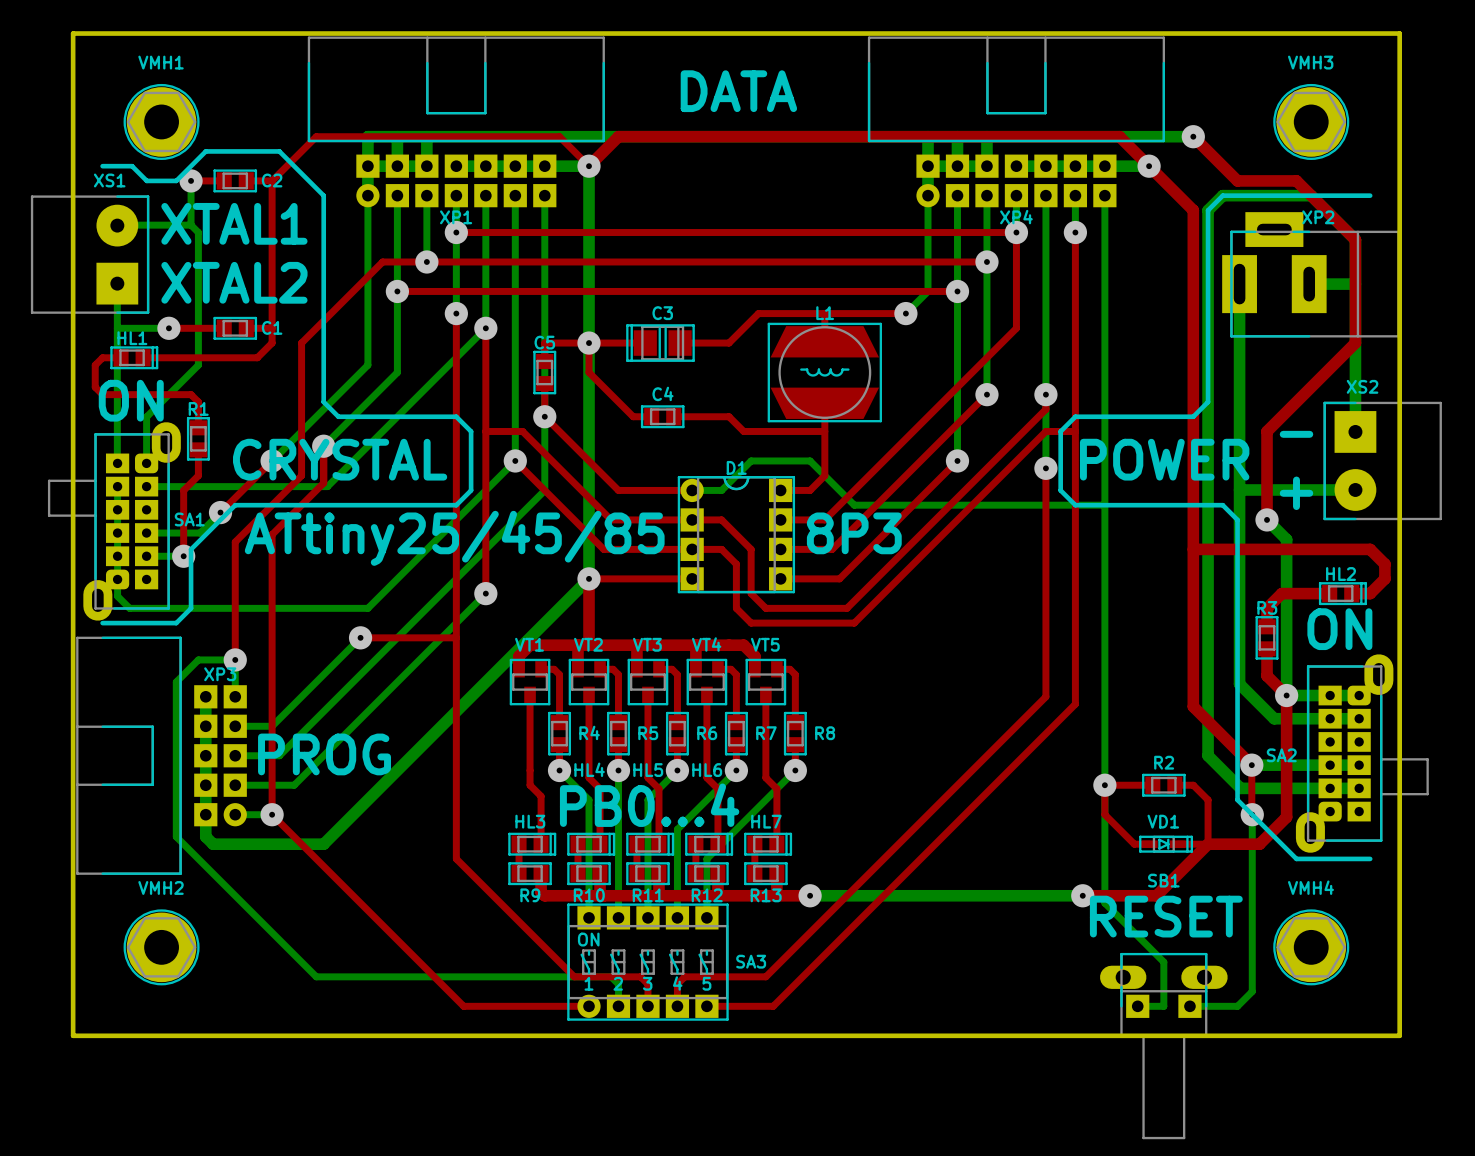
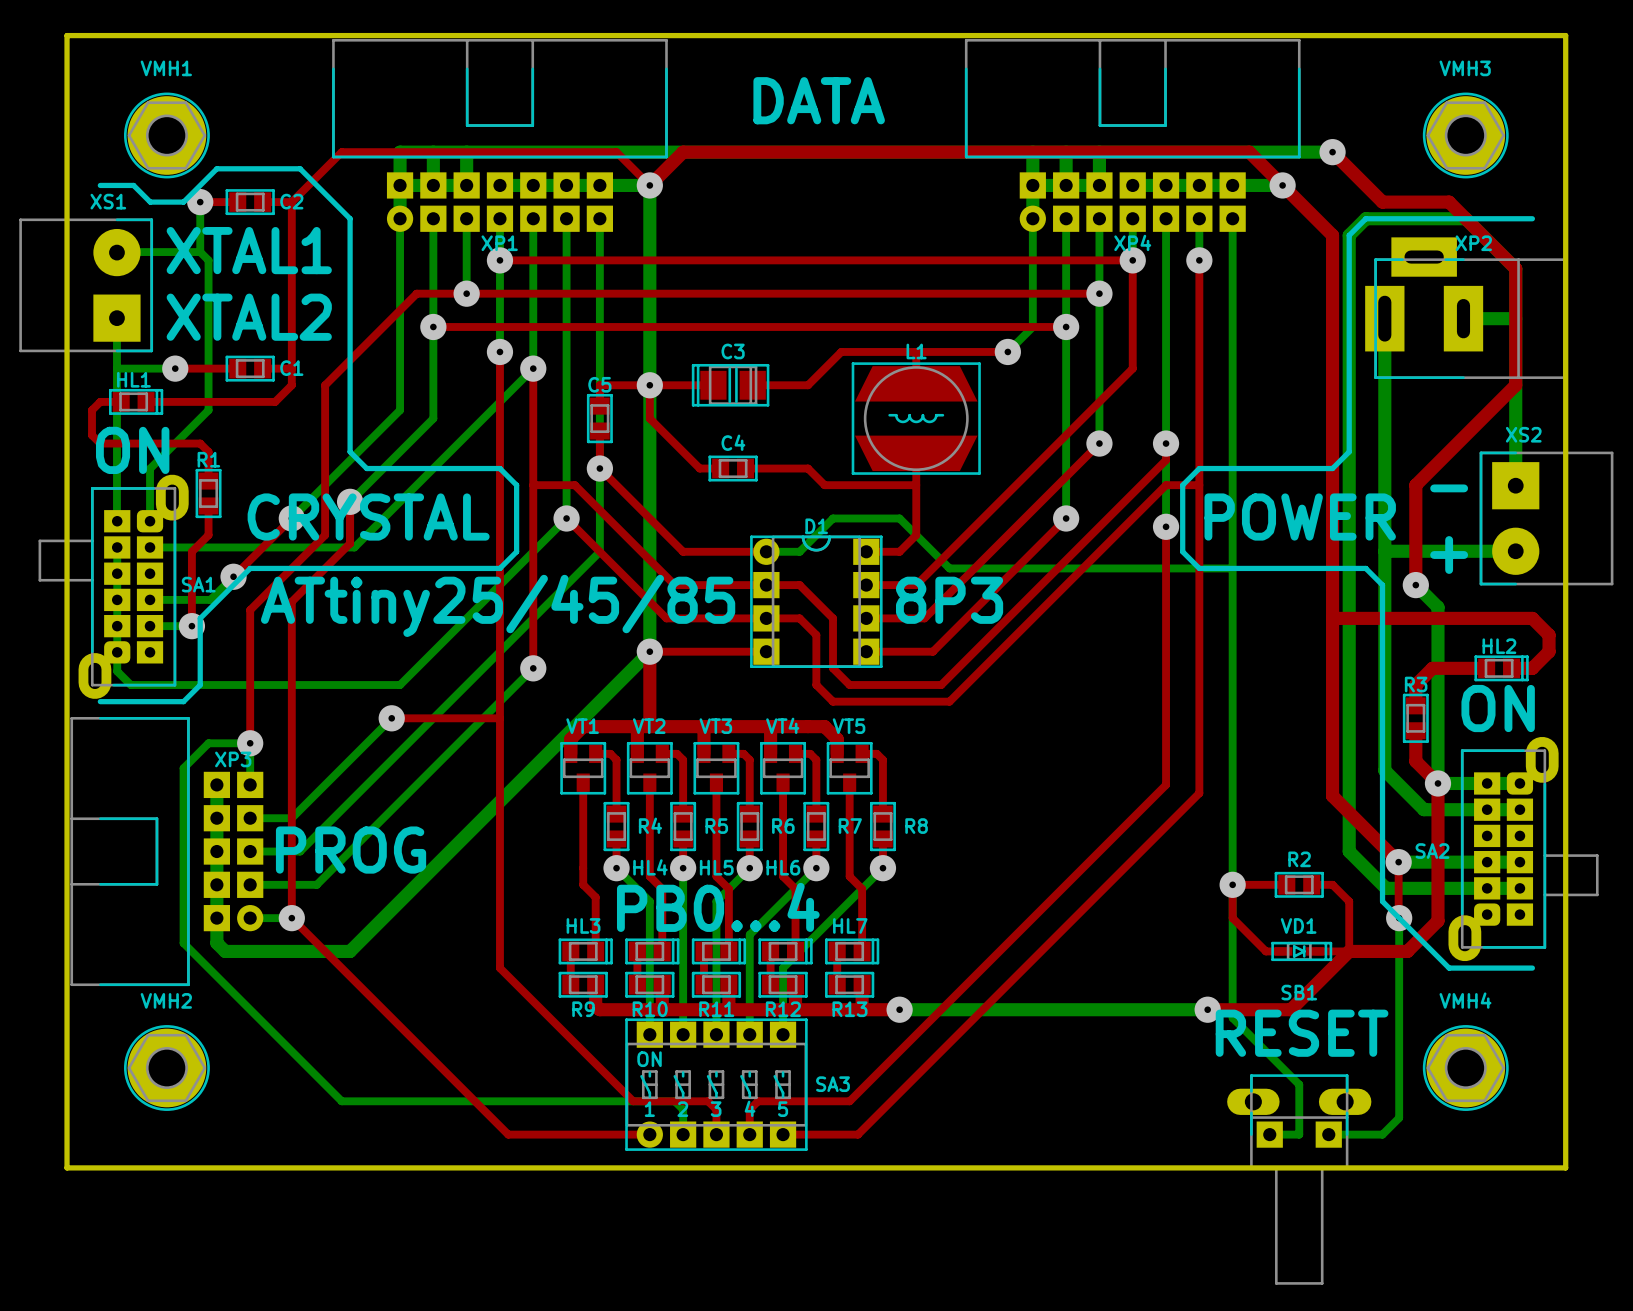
VMH1 footprint: [123, 83, 200, 160] -> [123, 92, 210, 179]
VMH3 footprint: [1273, 83, 1350, 160] -> [1422, 92, 1509, 179]
VMH2 footprint: [123, 909, 200, 986] -> [123, 1025, 210, 1111]
VMH4 footprint: [1273, 909, 1350, 986] -> [1422, 1025, 1509, 1111]

